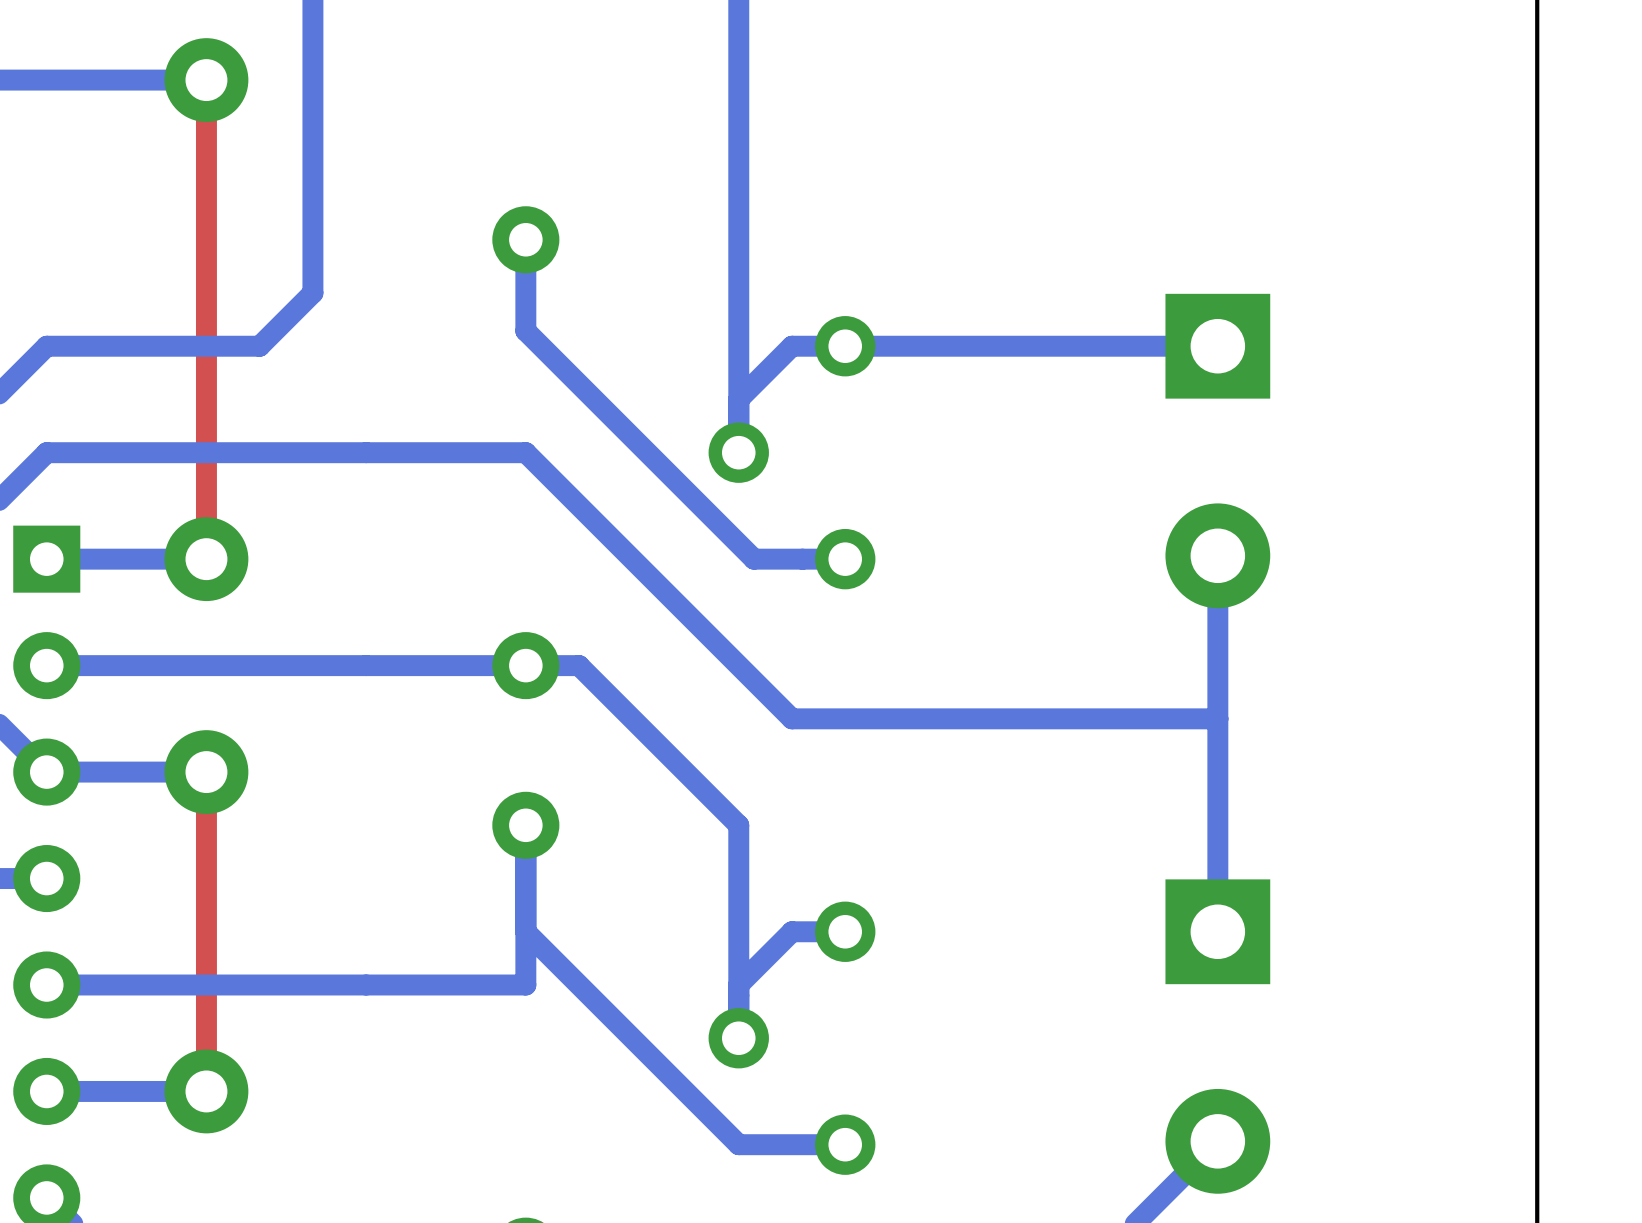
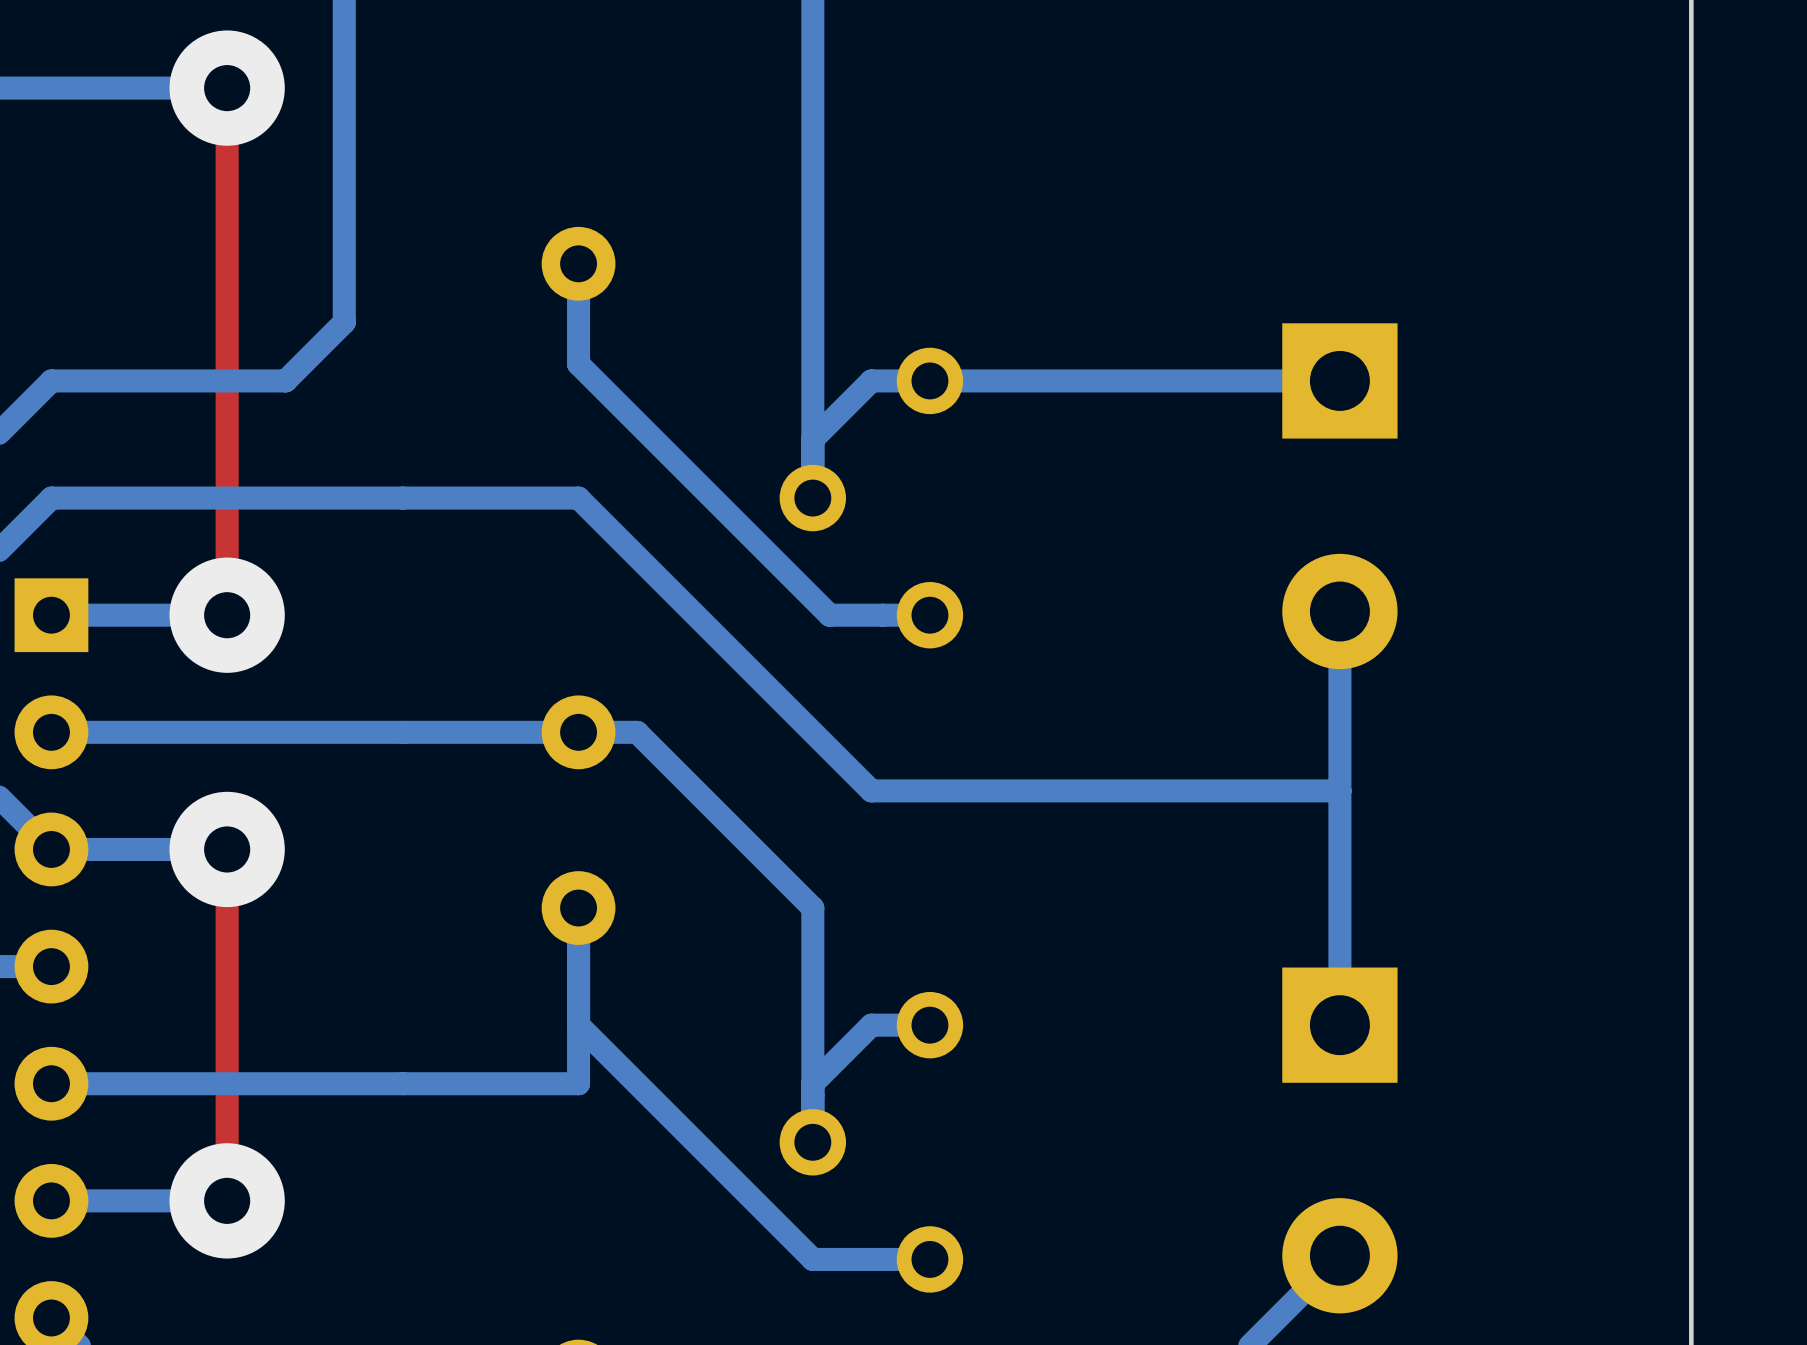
via size: [164, 38, 249, 122] -> [169, 30, 285, 146]
via size: [164, 517, 249, 602] -> [169, 557, 285, 673]
via size: [164, 730, 249, 814] -> [169, 791, 285, 908]
via size: [164, 1049, 249, 1134] -> [169, 1143, 285, 1259]

